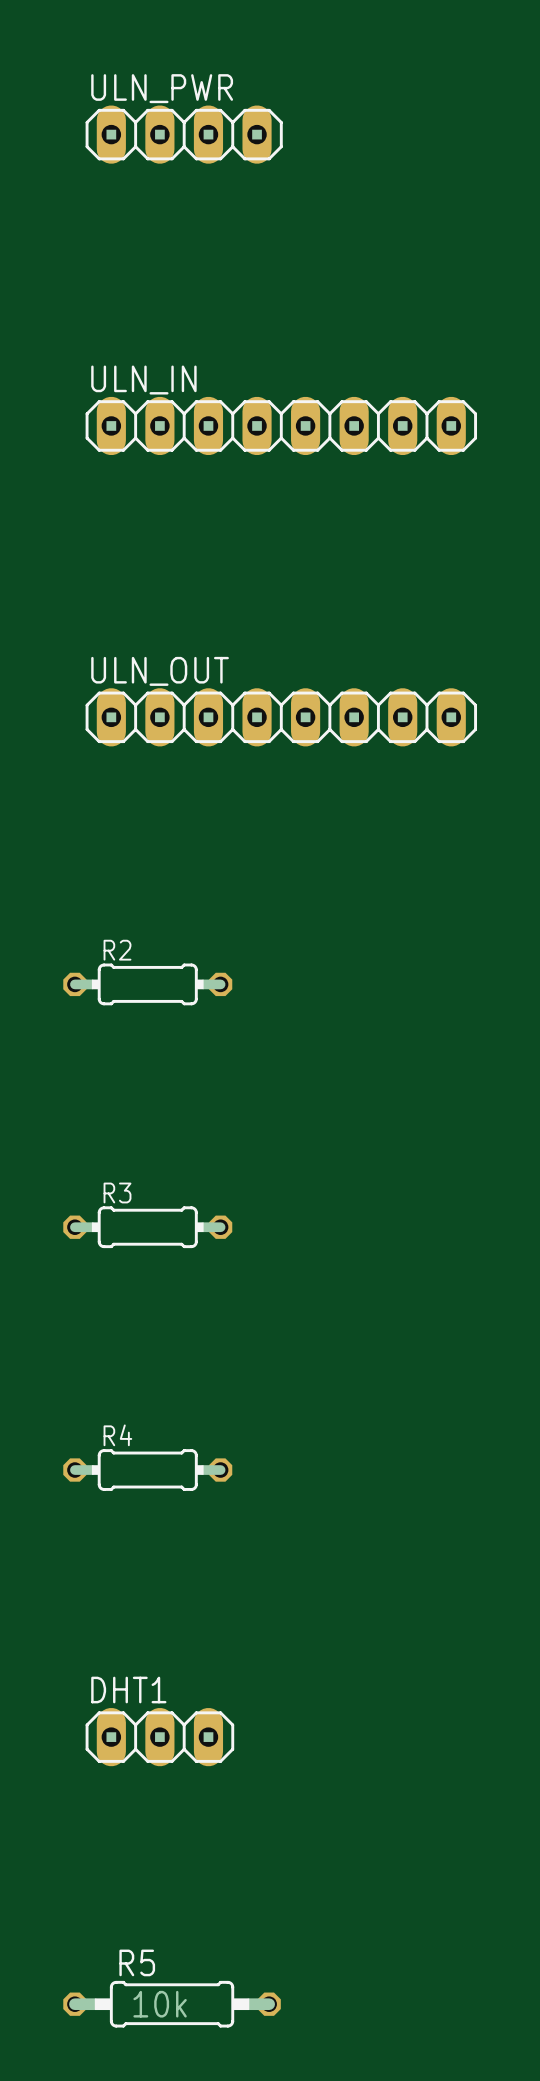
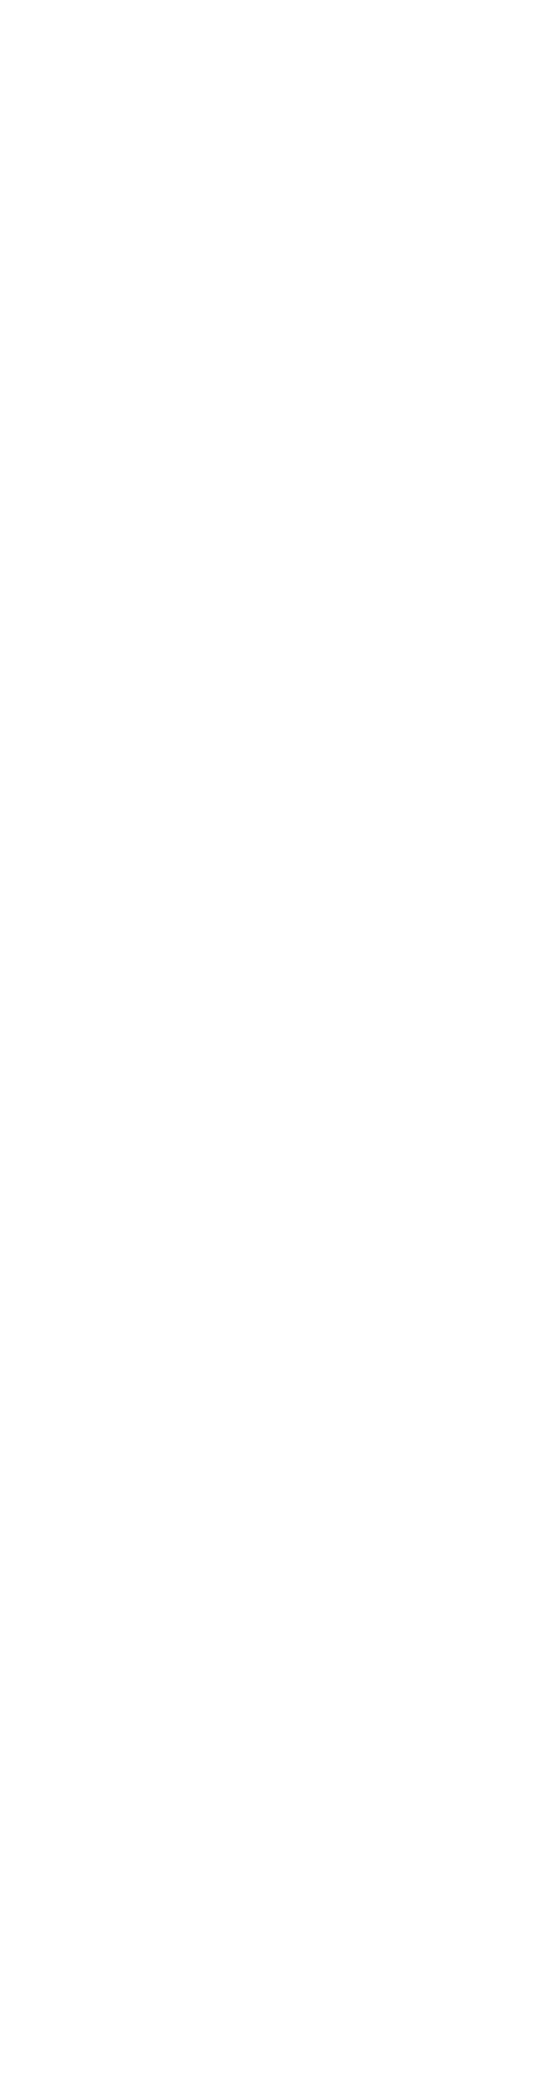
ULN_PWR: (184, 134) -> none
ULN_IN: (281, 425) -> none
ULN_OUT: (281, 717) -> none
R2: (147, 984) -> none
R3: (147, 1227) -> none
R4: (147, 1470) -> none
DHT1: (159, 1737) -> none
R5: 10k (172, 2004) -> none

